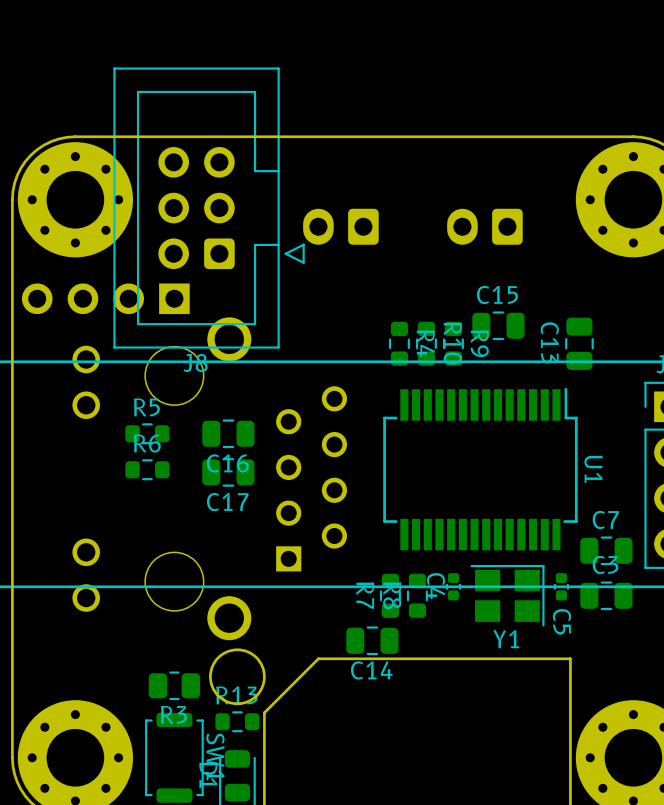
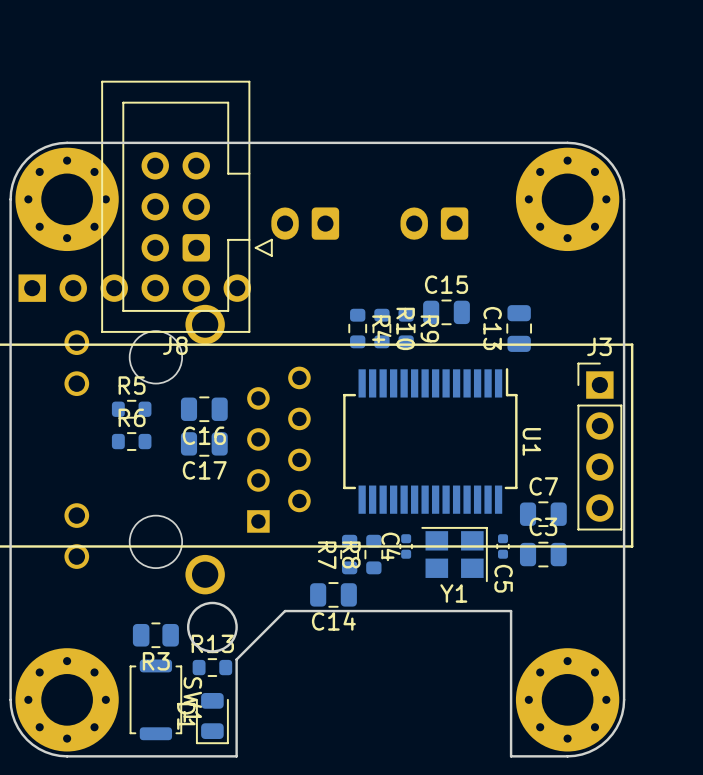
part: (105, 298) -> none
part: none -> (134, 288)

